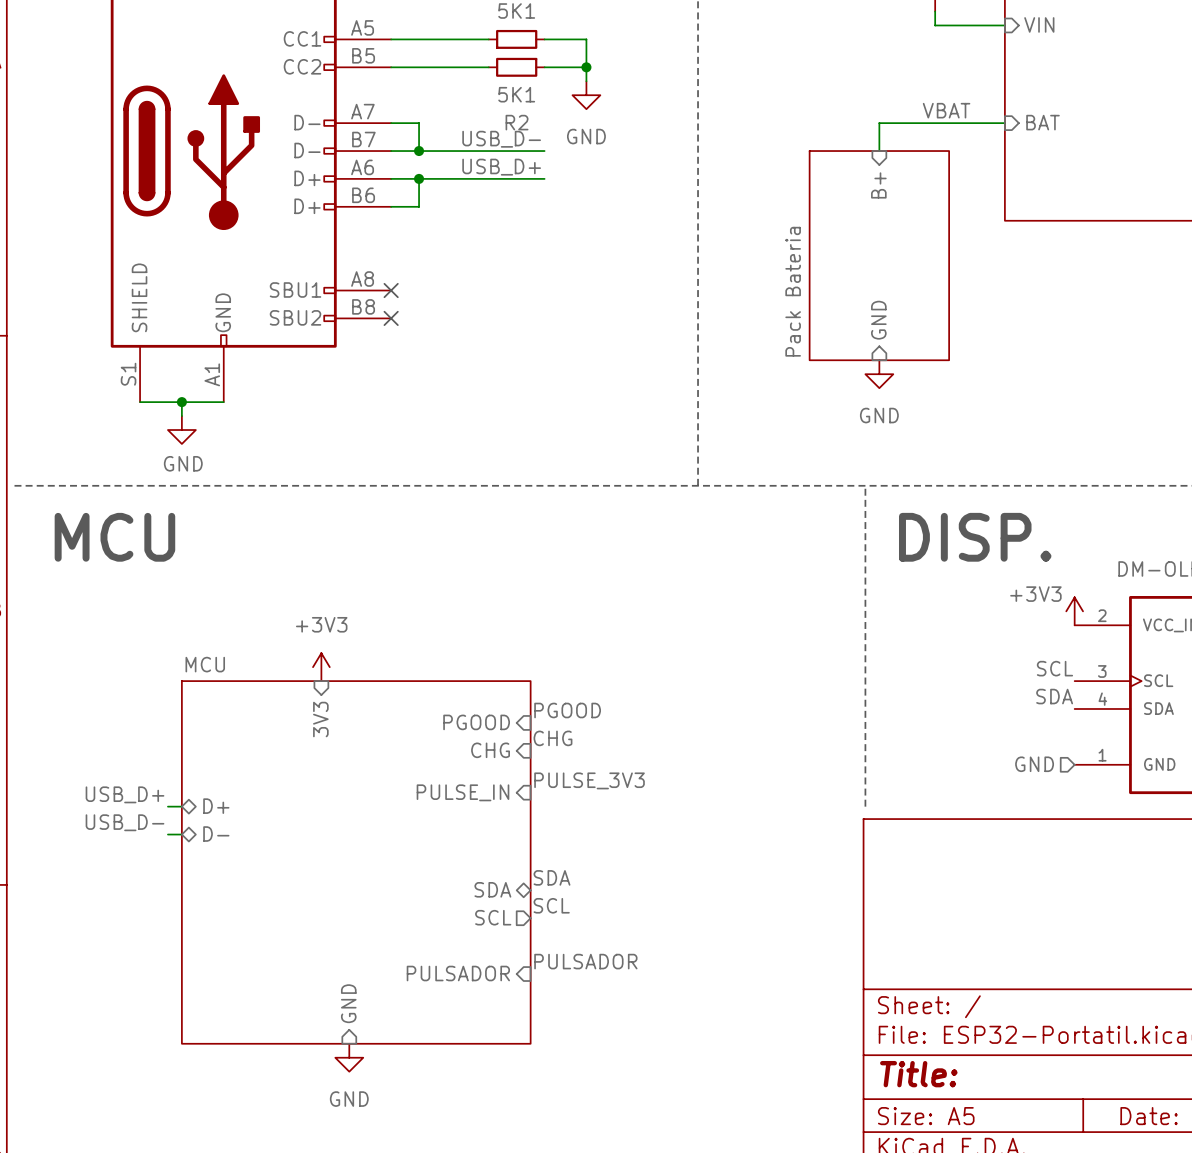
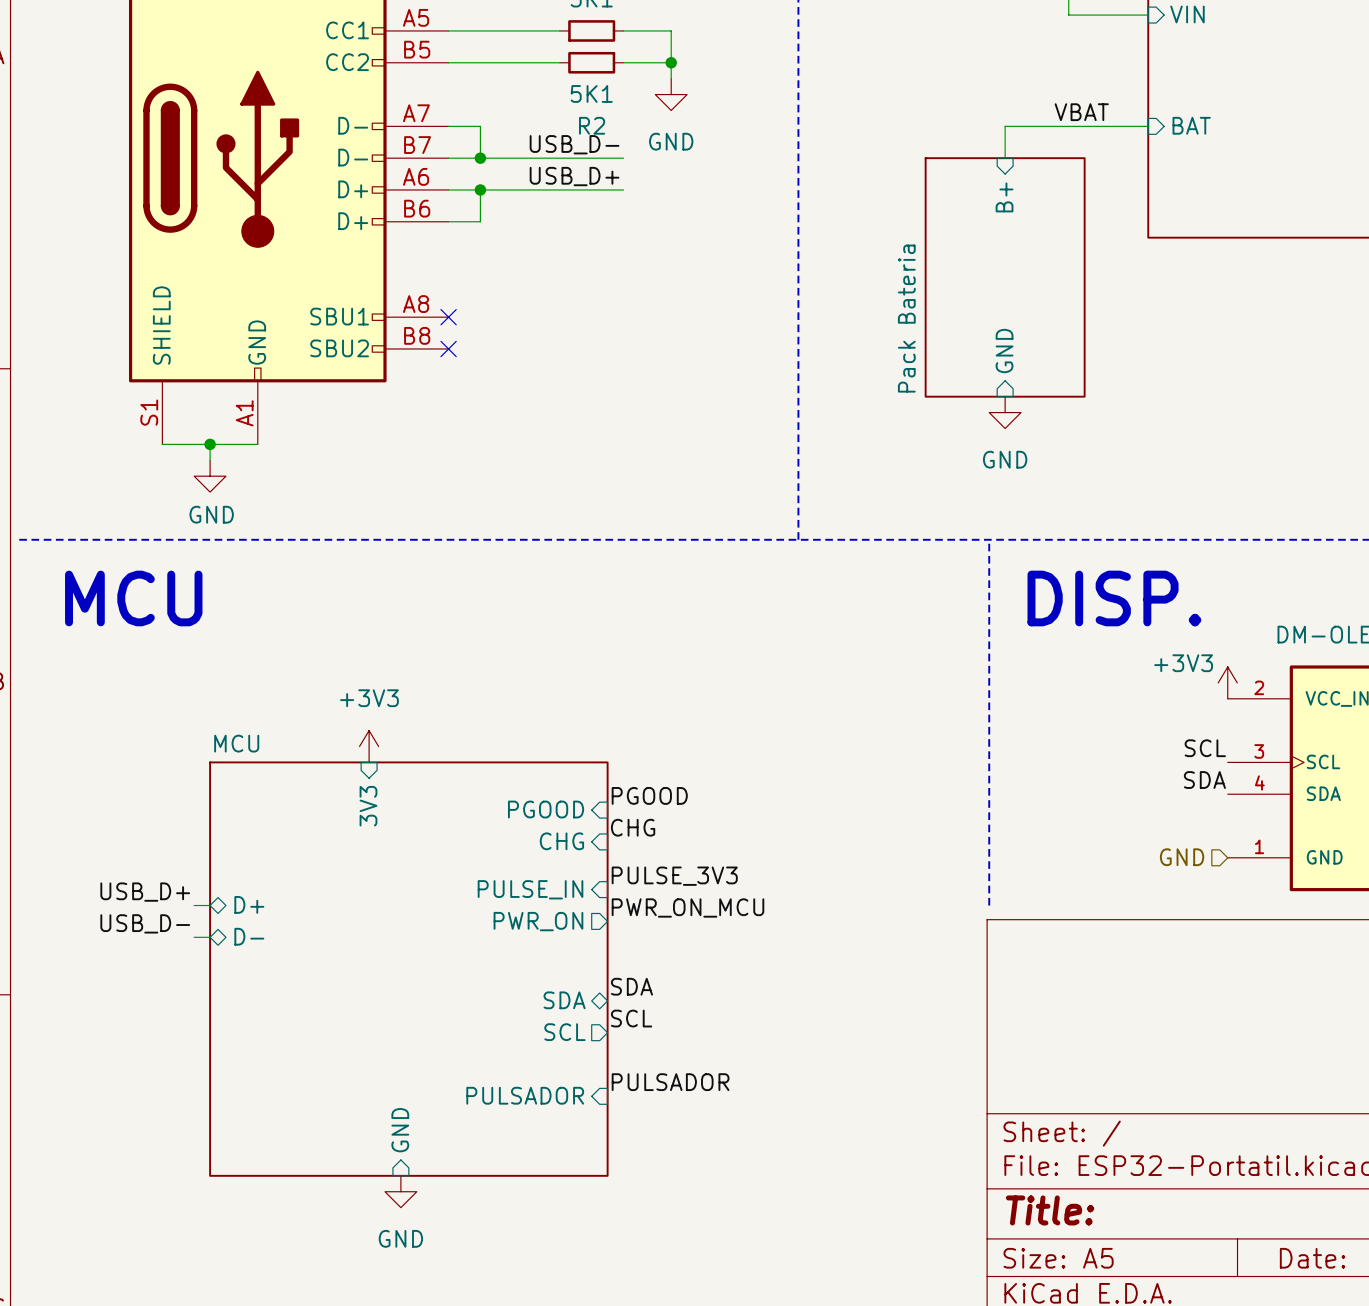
label: none -> PWR_ON_MCU (687, 907)
sheet pin: none -> PWR_ON (538, 921)

